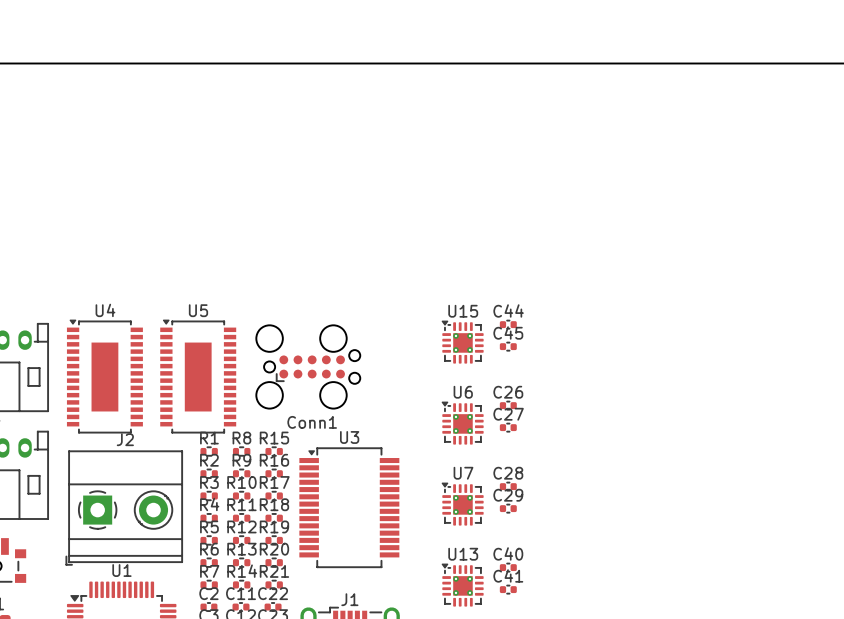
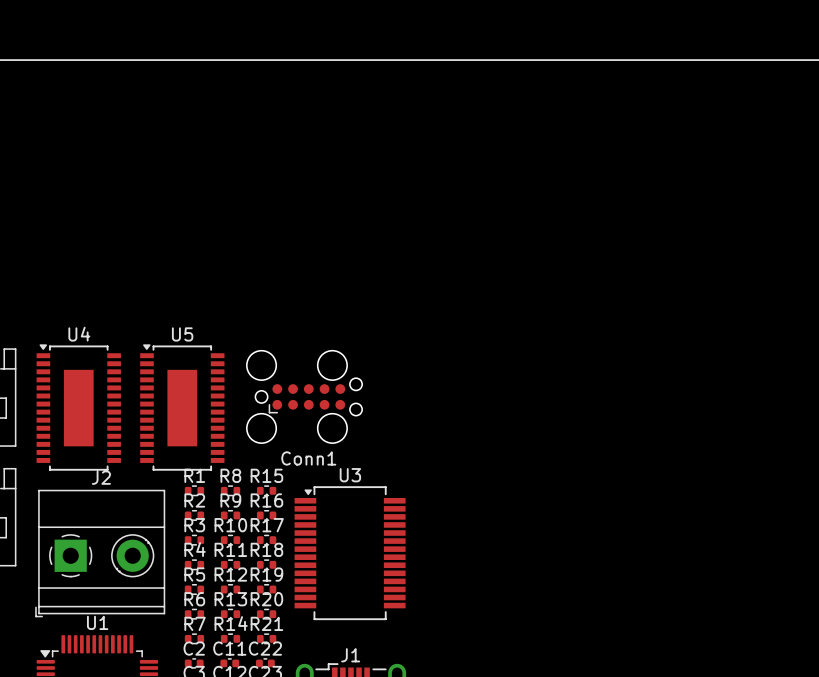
C44: (508, 324) -> none
U15: (462, 342) -> none
C45: (508, 346) -> none
C26: (508, 405) -> none
U6: (462, 423) -> none
C27: (508, 427) -> none
C28: (508, 486) -> none
U7: (462, 504) -> none
C29: (508, 508) -> none
C40: (508, 567) -> none
U13: (462, 585) -> none
C41: (508, 589) -> none

